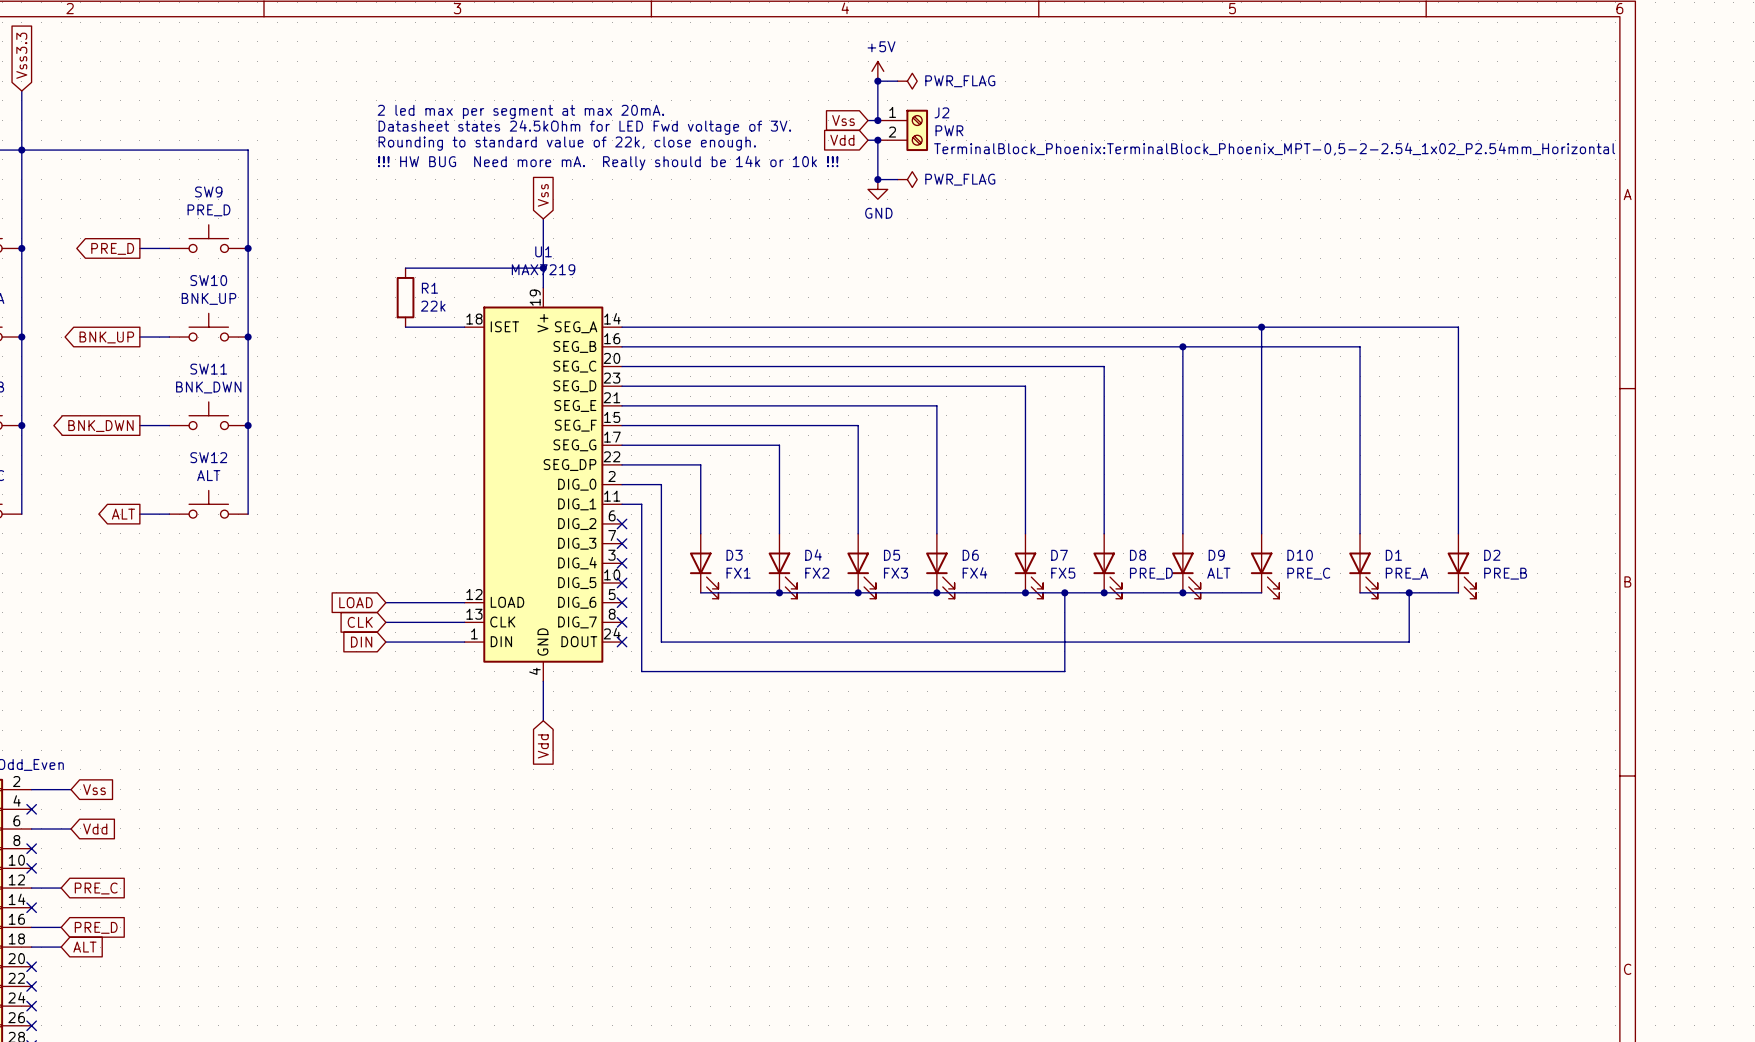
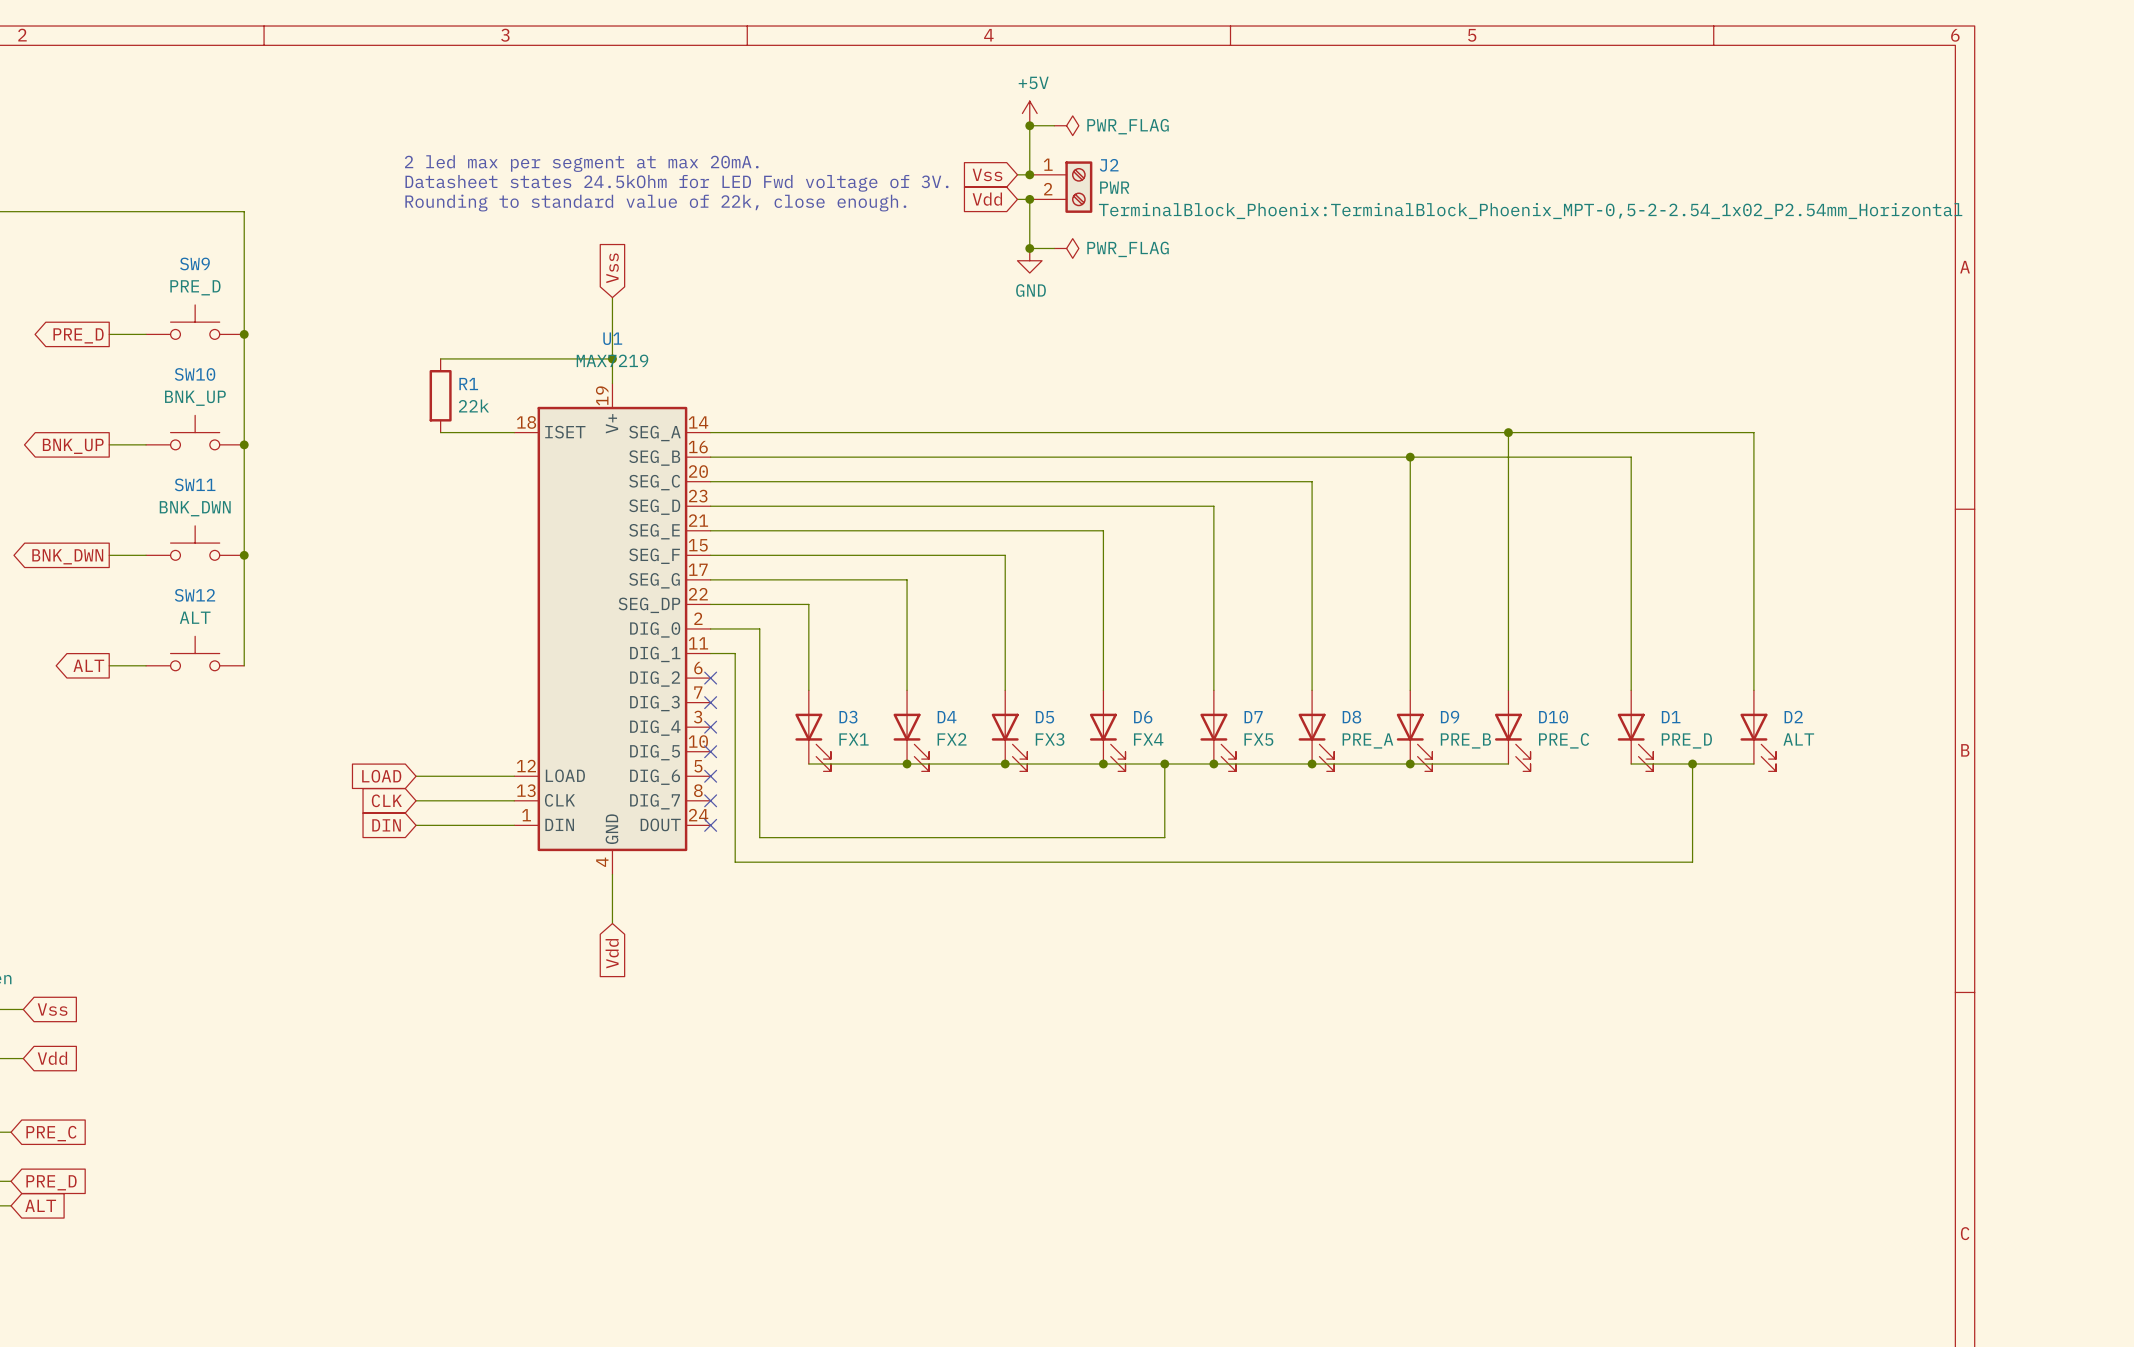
text: !!! HW BUG Need more mA. Really should be 14k or 10k !!! (608, 163) -> none
D8 value: PRE_D (1151, 573) -> PRE_A (1367, 740)
D9 value: ALT (1218, 573) -> PRE_B (1465, 740)
D1 value: PRE_A (1406, 573) -> PRE_D (1686, 740)
D2 value: PRE_B (1505, 573) -> ALT (1798, 739)
junction: none -> (1164, 763)
wire: (1064, 592) (1064, 671) -> (1692, 825) (1692, 862) (1262, 862)
junction: (1064, 592) -> none
wire: (661, 642) (1409, 642) -> (759, 825) (759, 837) (1164, 837) (1164, 763)

